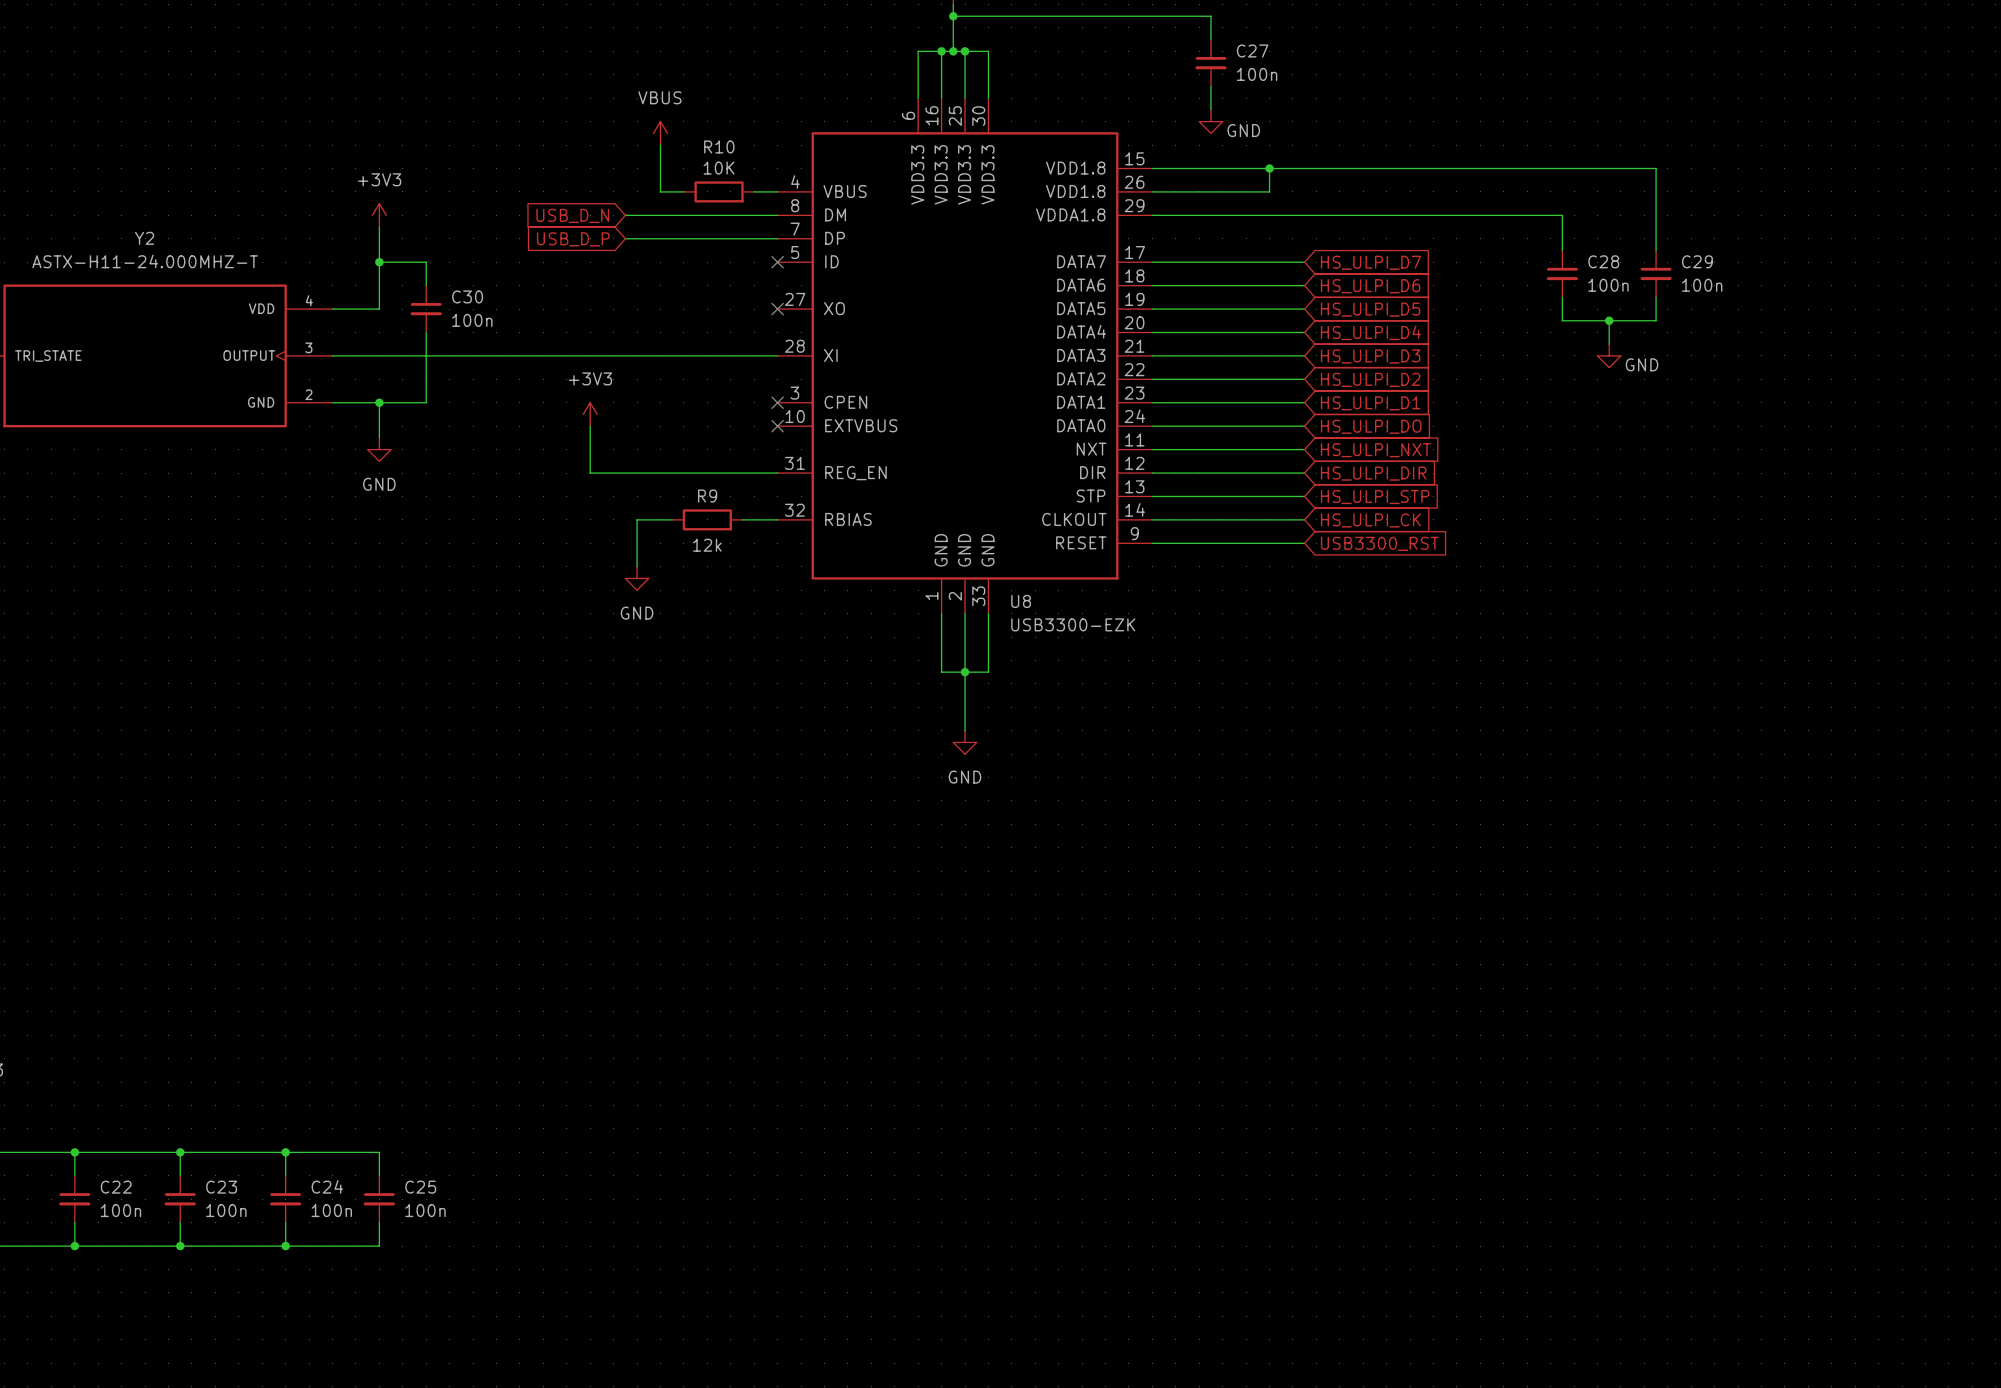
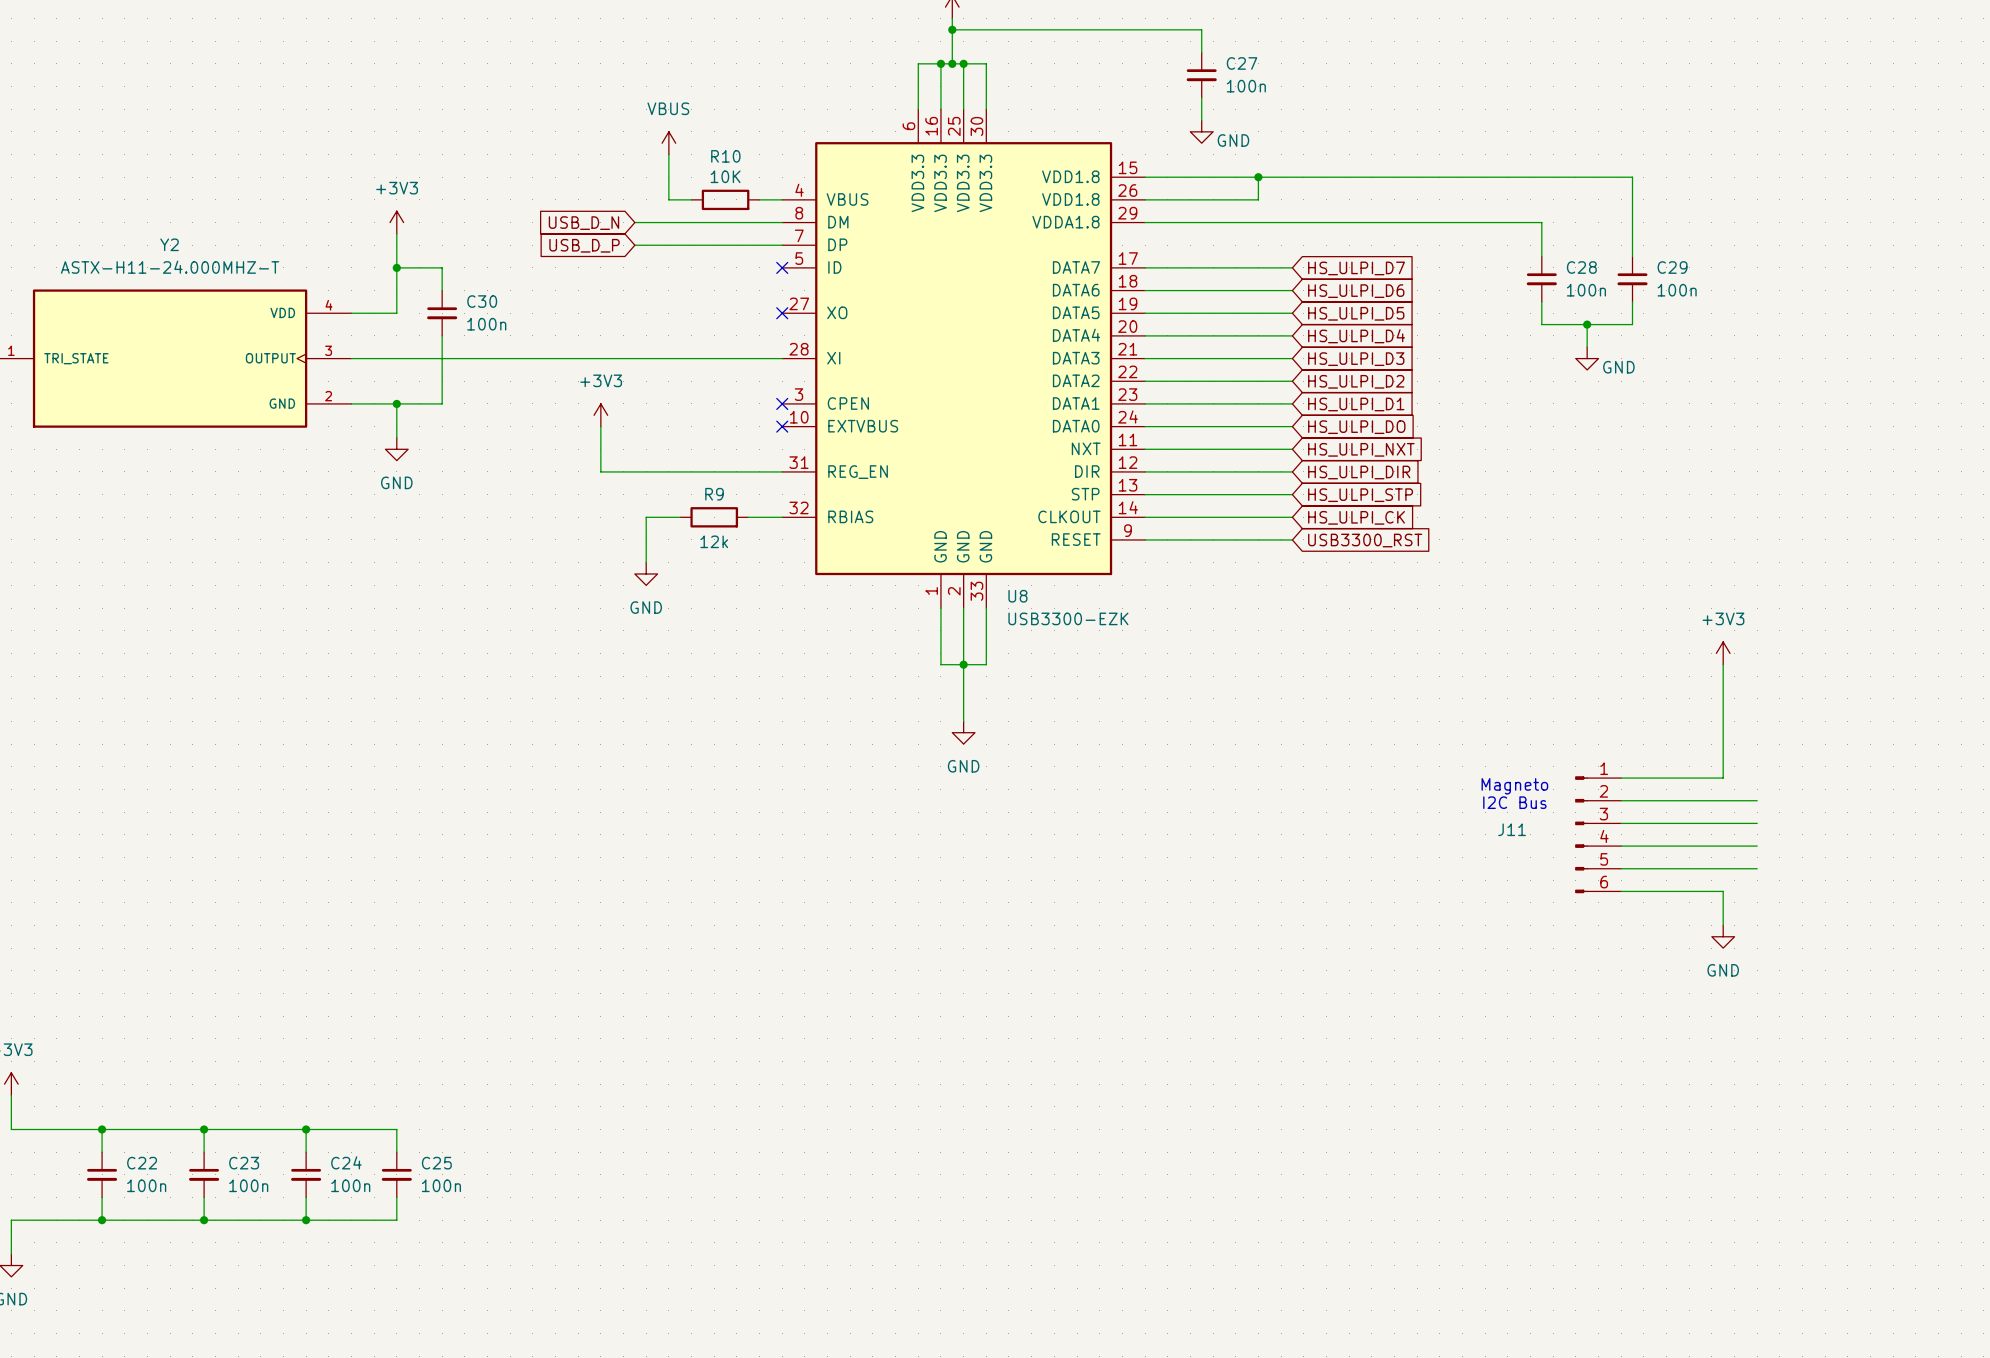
power symbol: none -> +3V3 (1723, 653)
wire: none -> (1723, 664) (1723, 778) (1621, 778)
text: none -> Magneto (1514, 786)
wire: none -> (1621, 800) (1757, 800)
text: none -> I2C Bus (1514, 802)
wire: none -> (1621, 823) (1757, 823)
J11: none -> (1598, 834)
wire: none -> (1621, 846) (1757, 846)
wire: none -> (1621, 868) (1757, 868)
wire: none -> (1621, 891) (1723, 891) (1723, 925)
power symbol: none -> GND (1723, 936)

